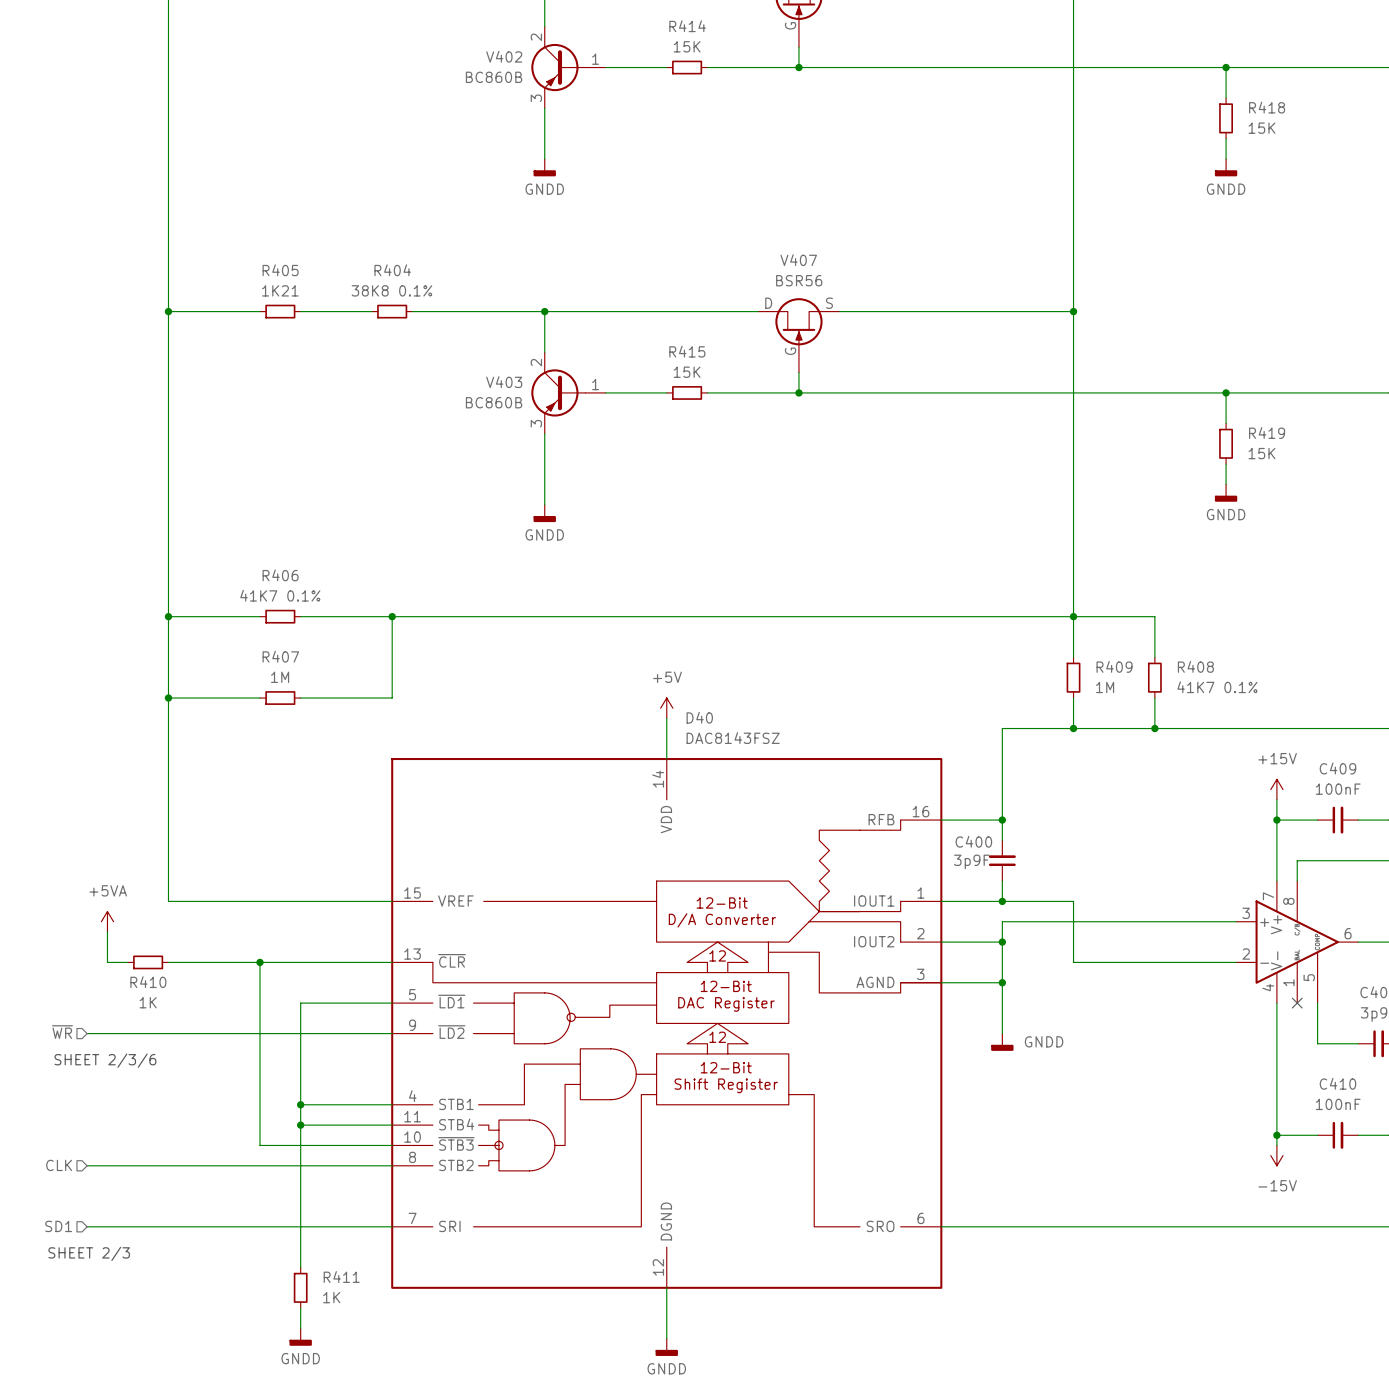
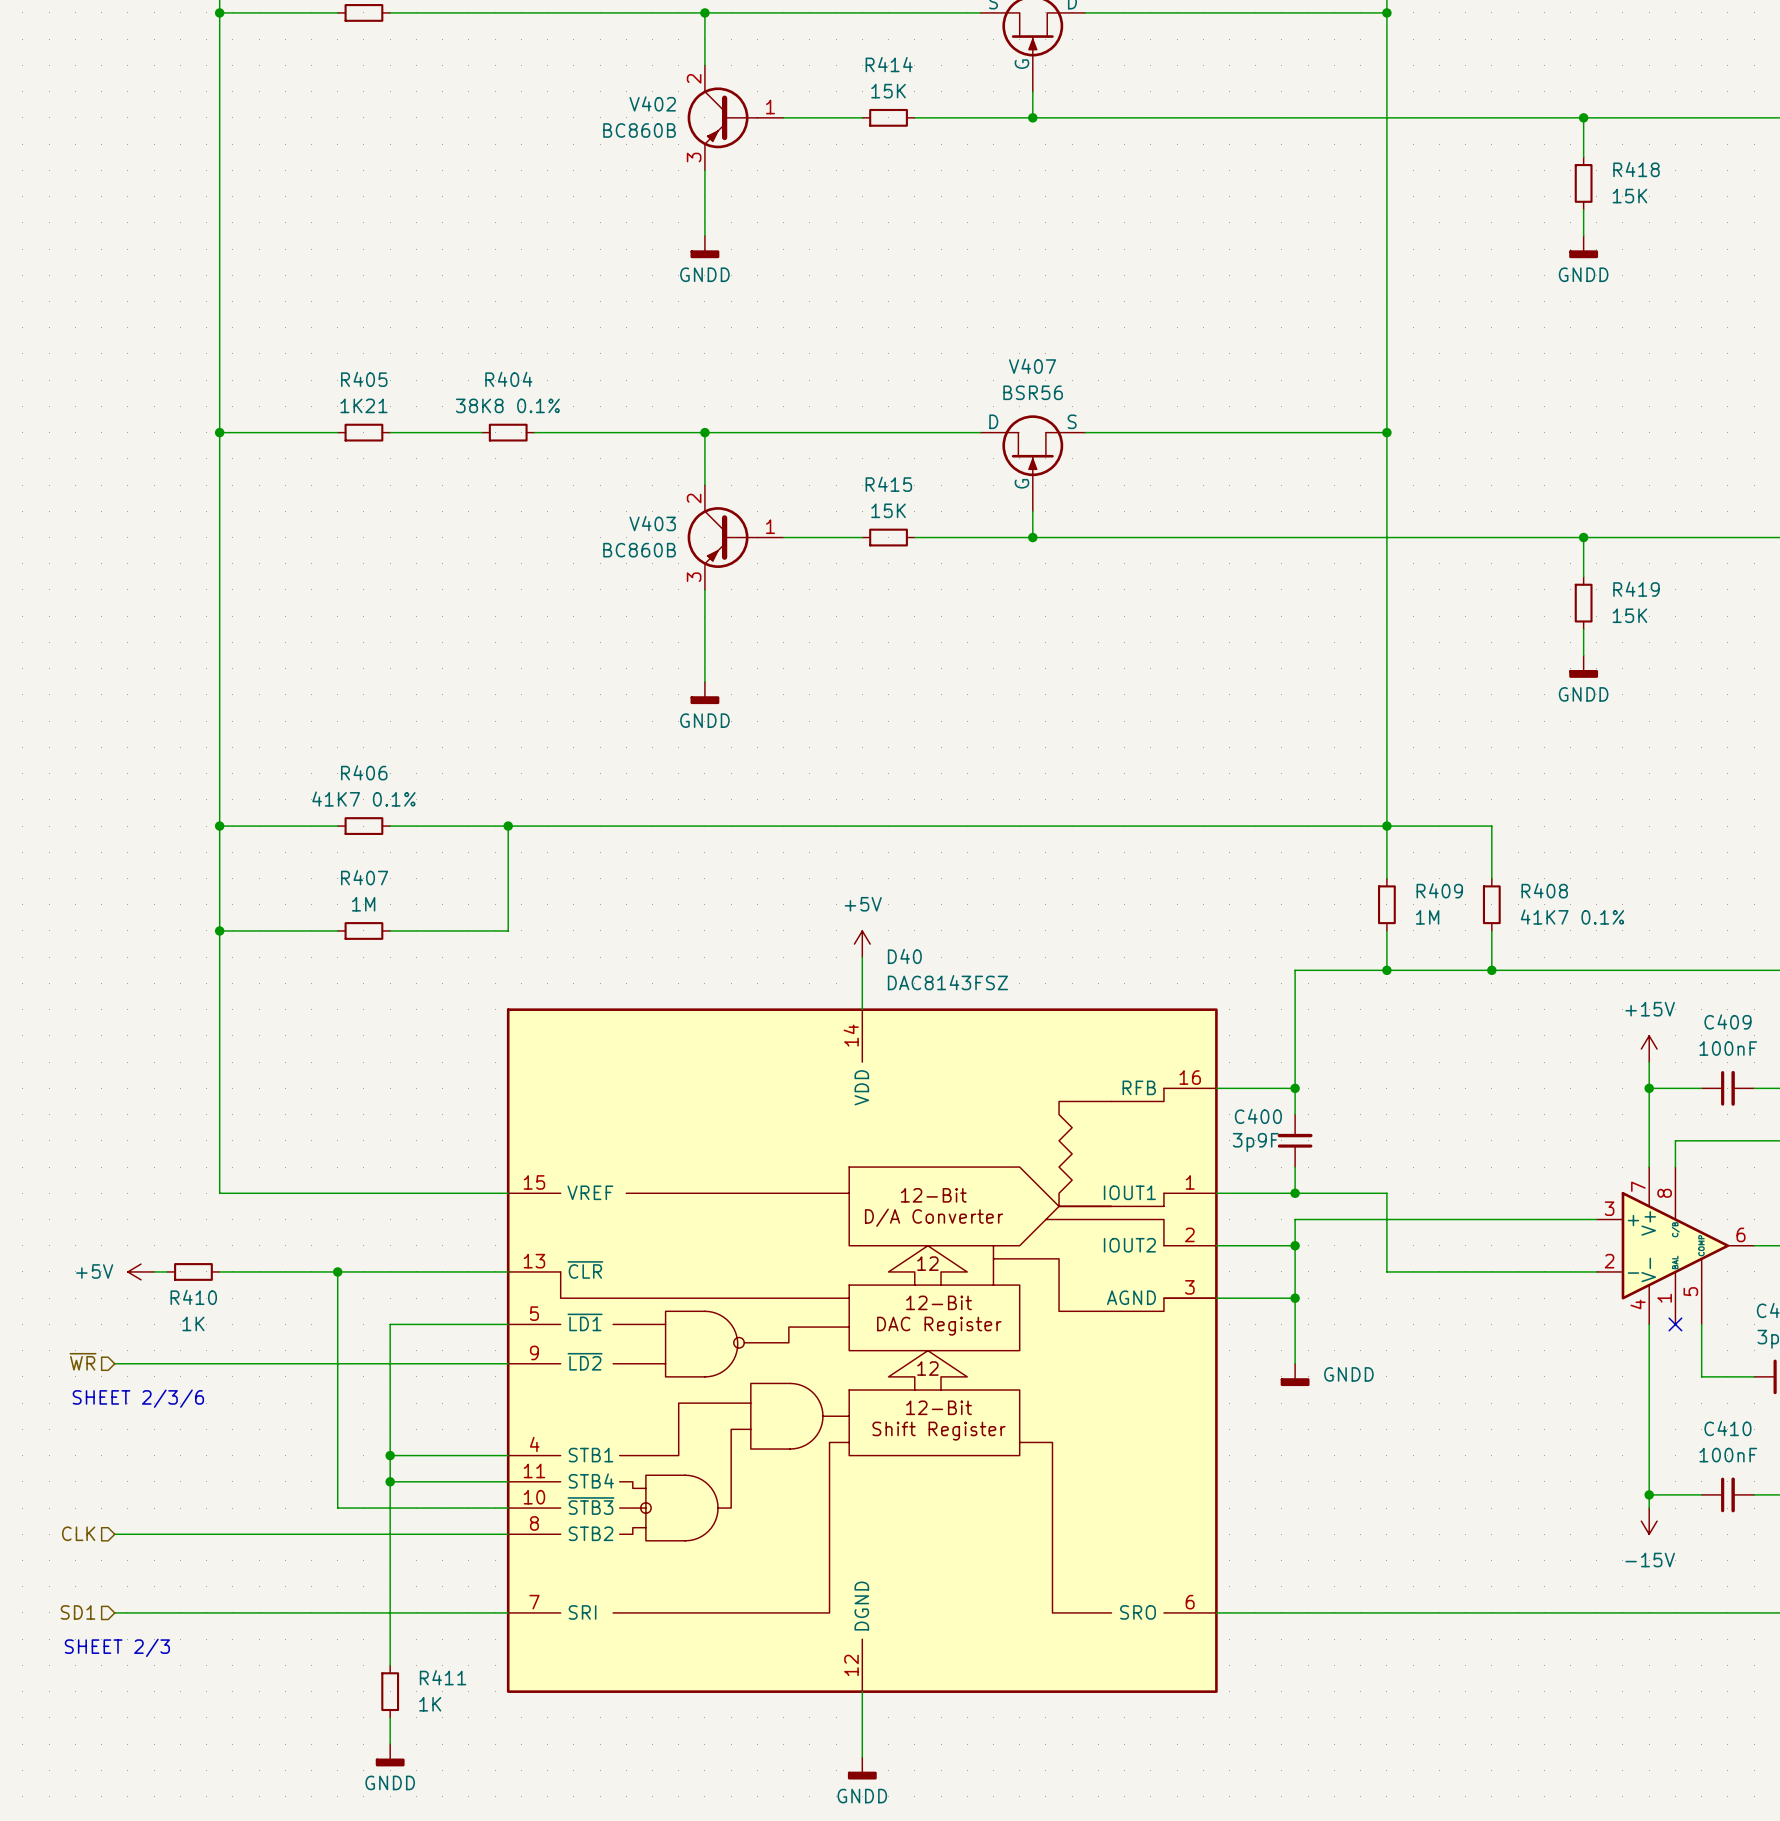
power symbol: +5VA (107, 921) -> none
wire: (107, 931) (107, 962) (117, 962) -> none
power symbol: none -> +5V (140, 1271)

